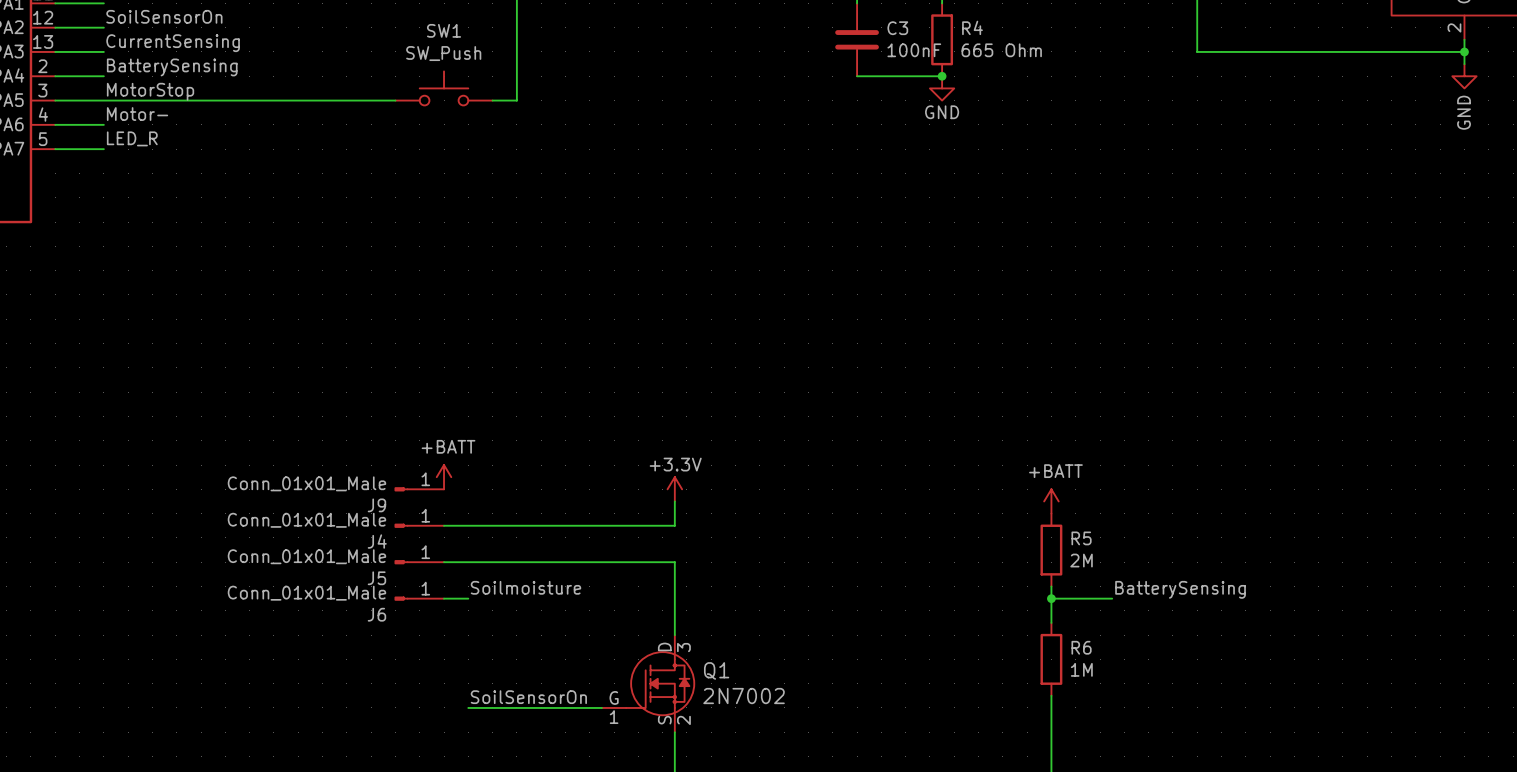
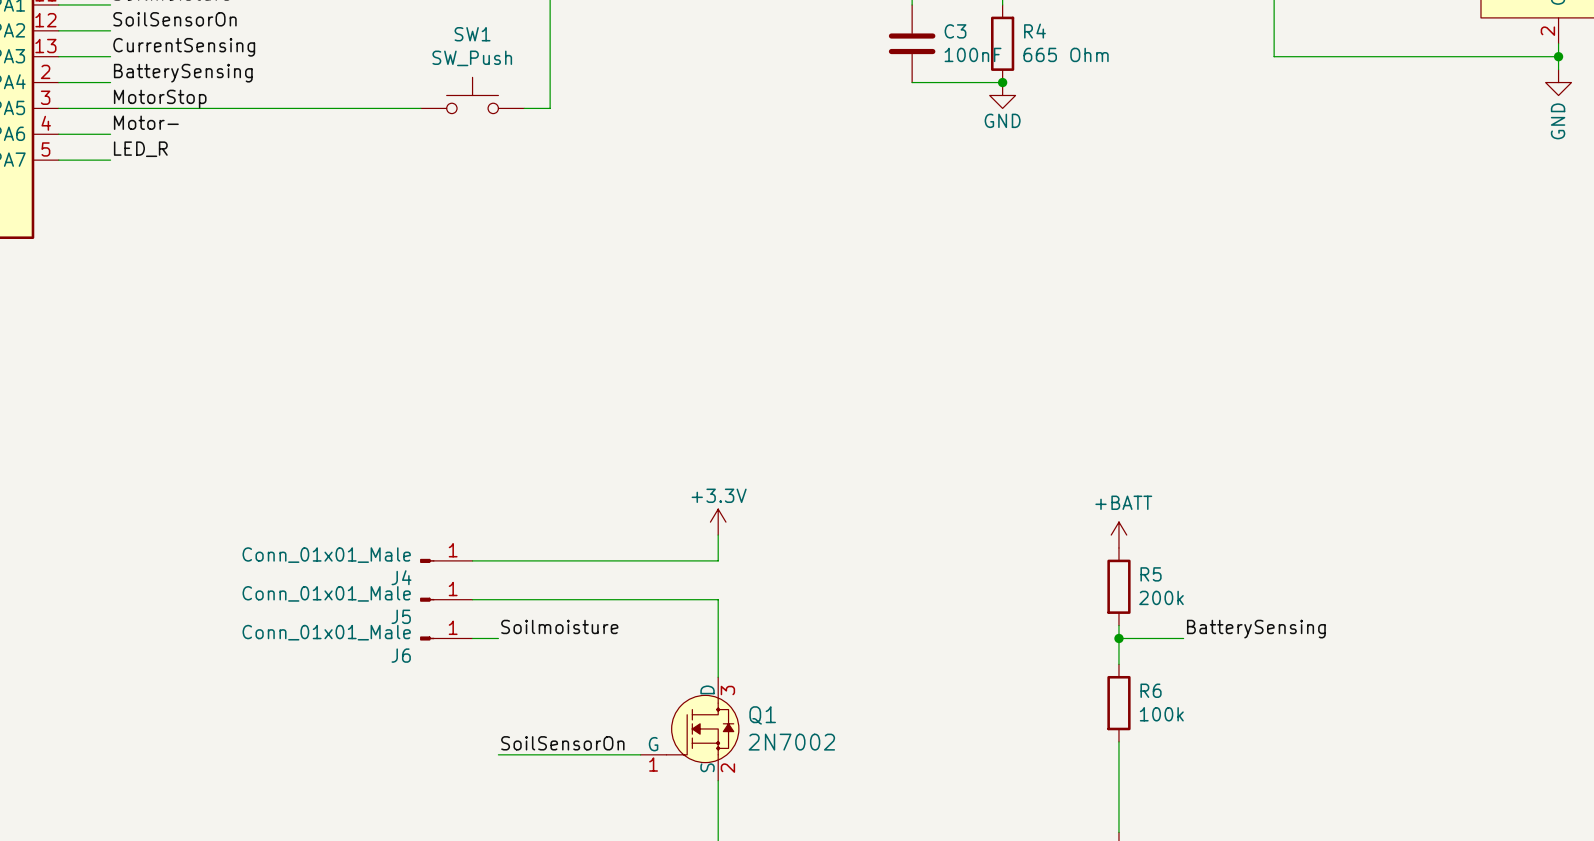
power symbol: +BATT (444, 477) -> none
J9: Conn_01x01_Male (419, 489) -> none
R5 value: 2M (1081, 560) -> 200k (1161, 597)
R6 value: 1M (1081, 669) -> 100k (1161, 714)

